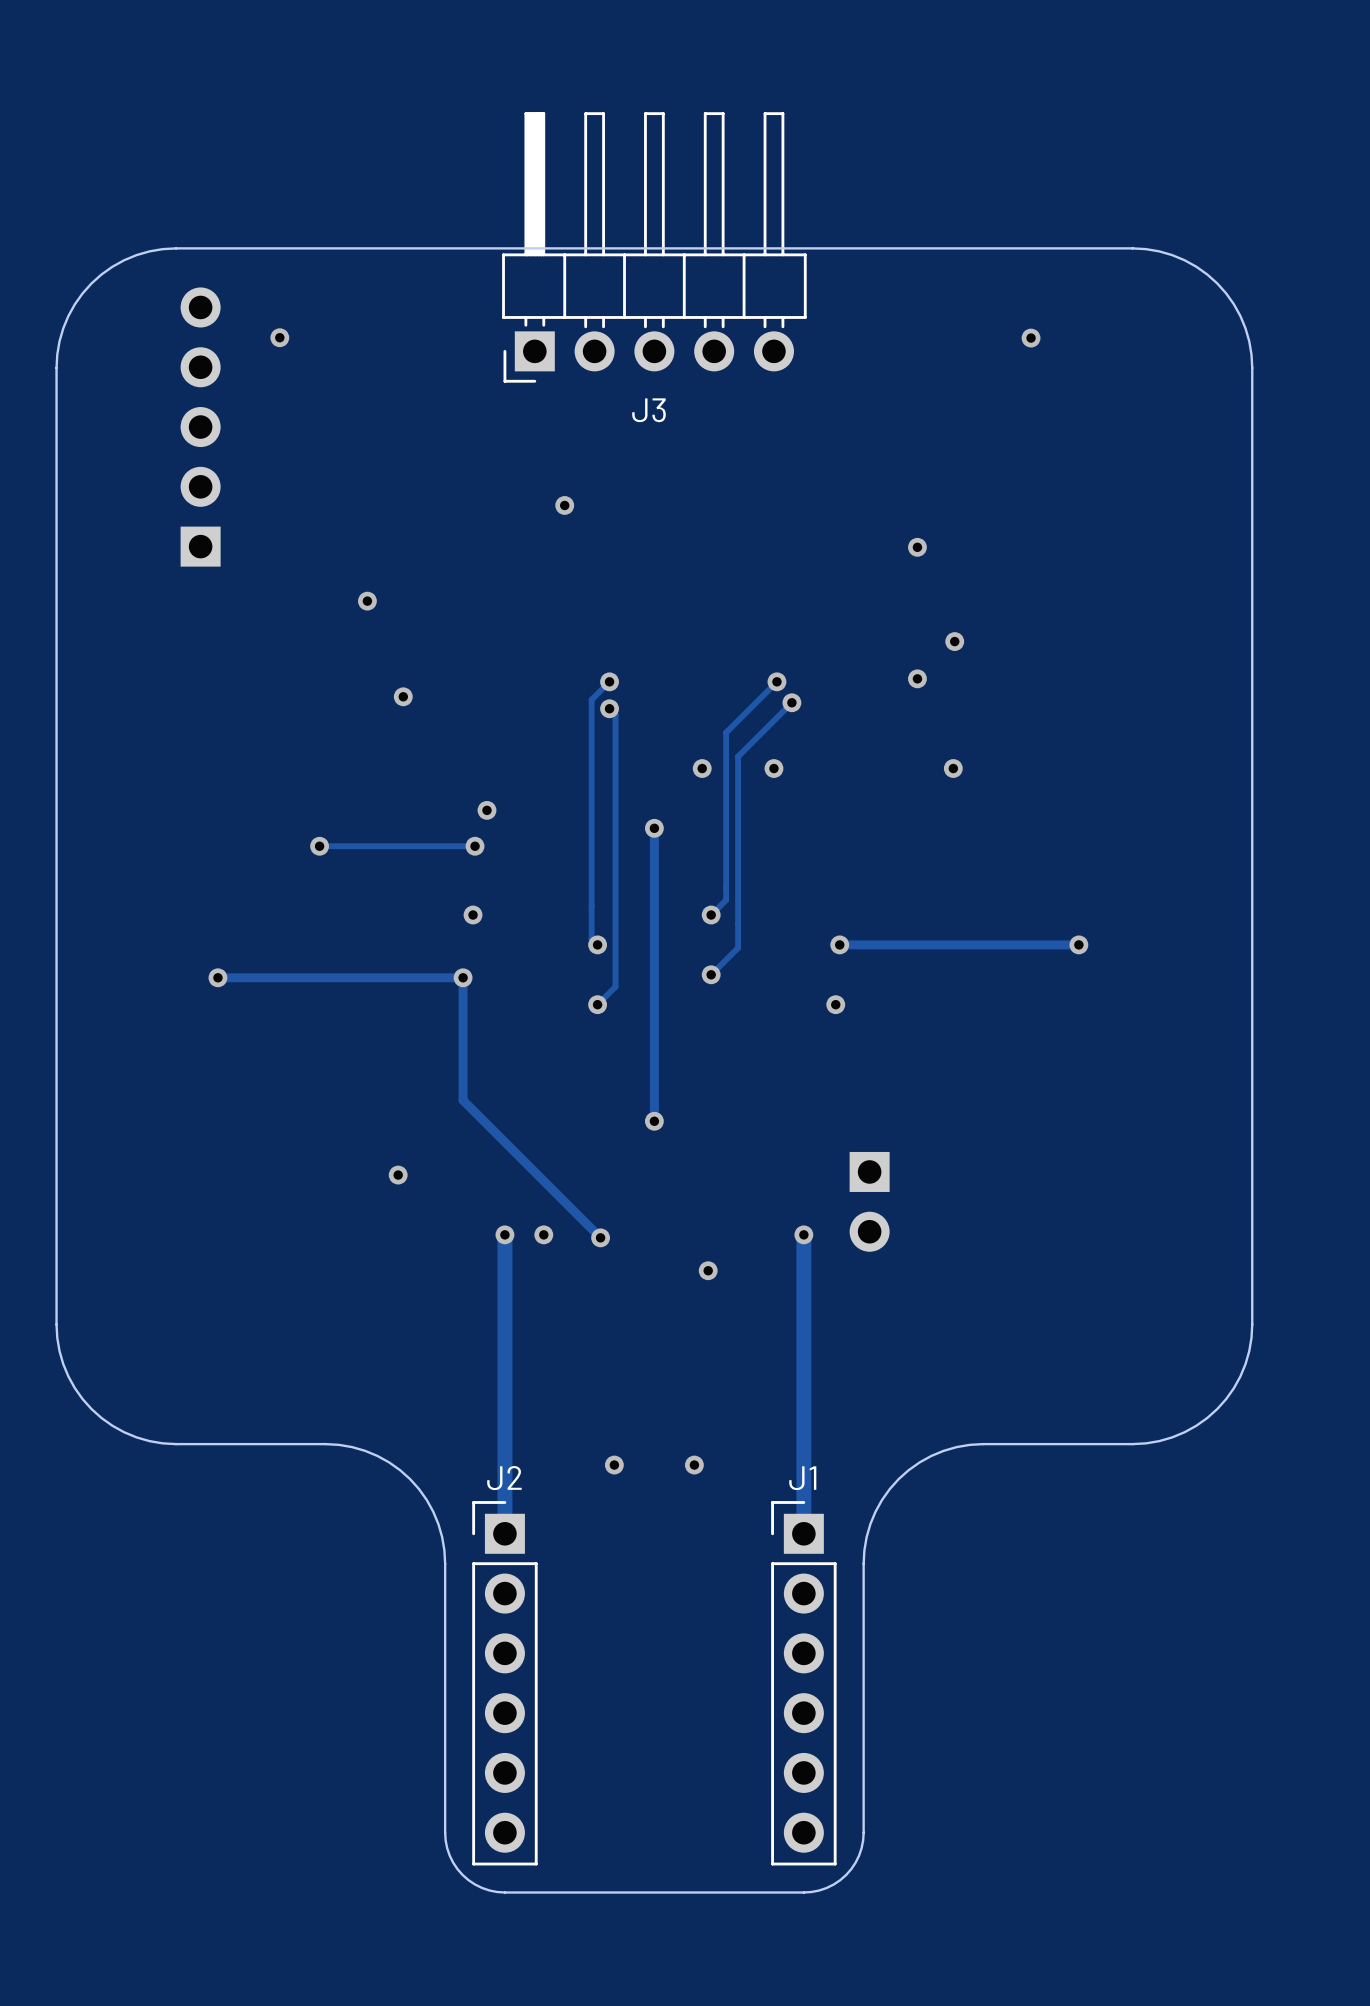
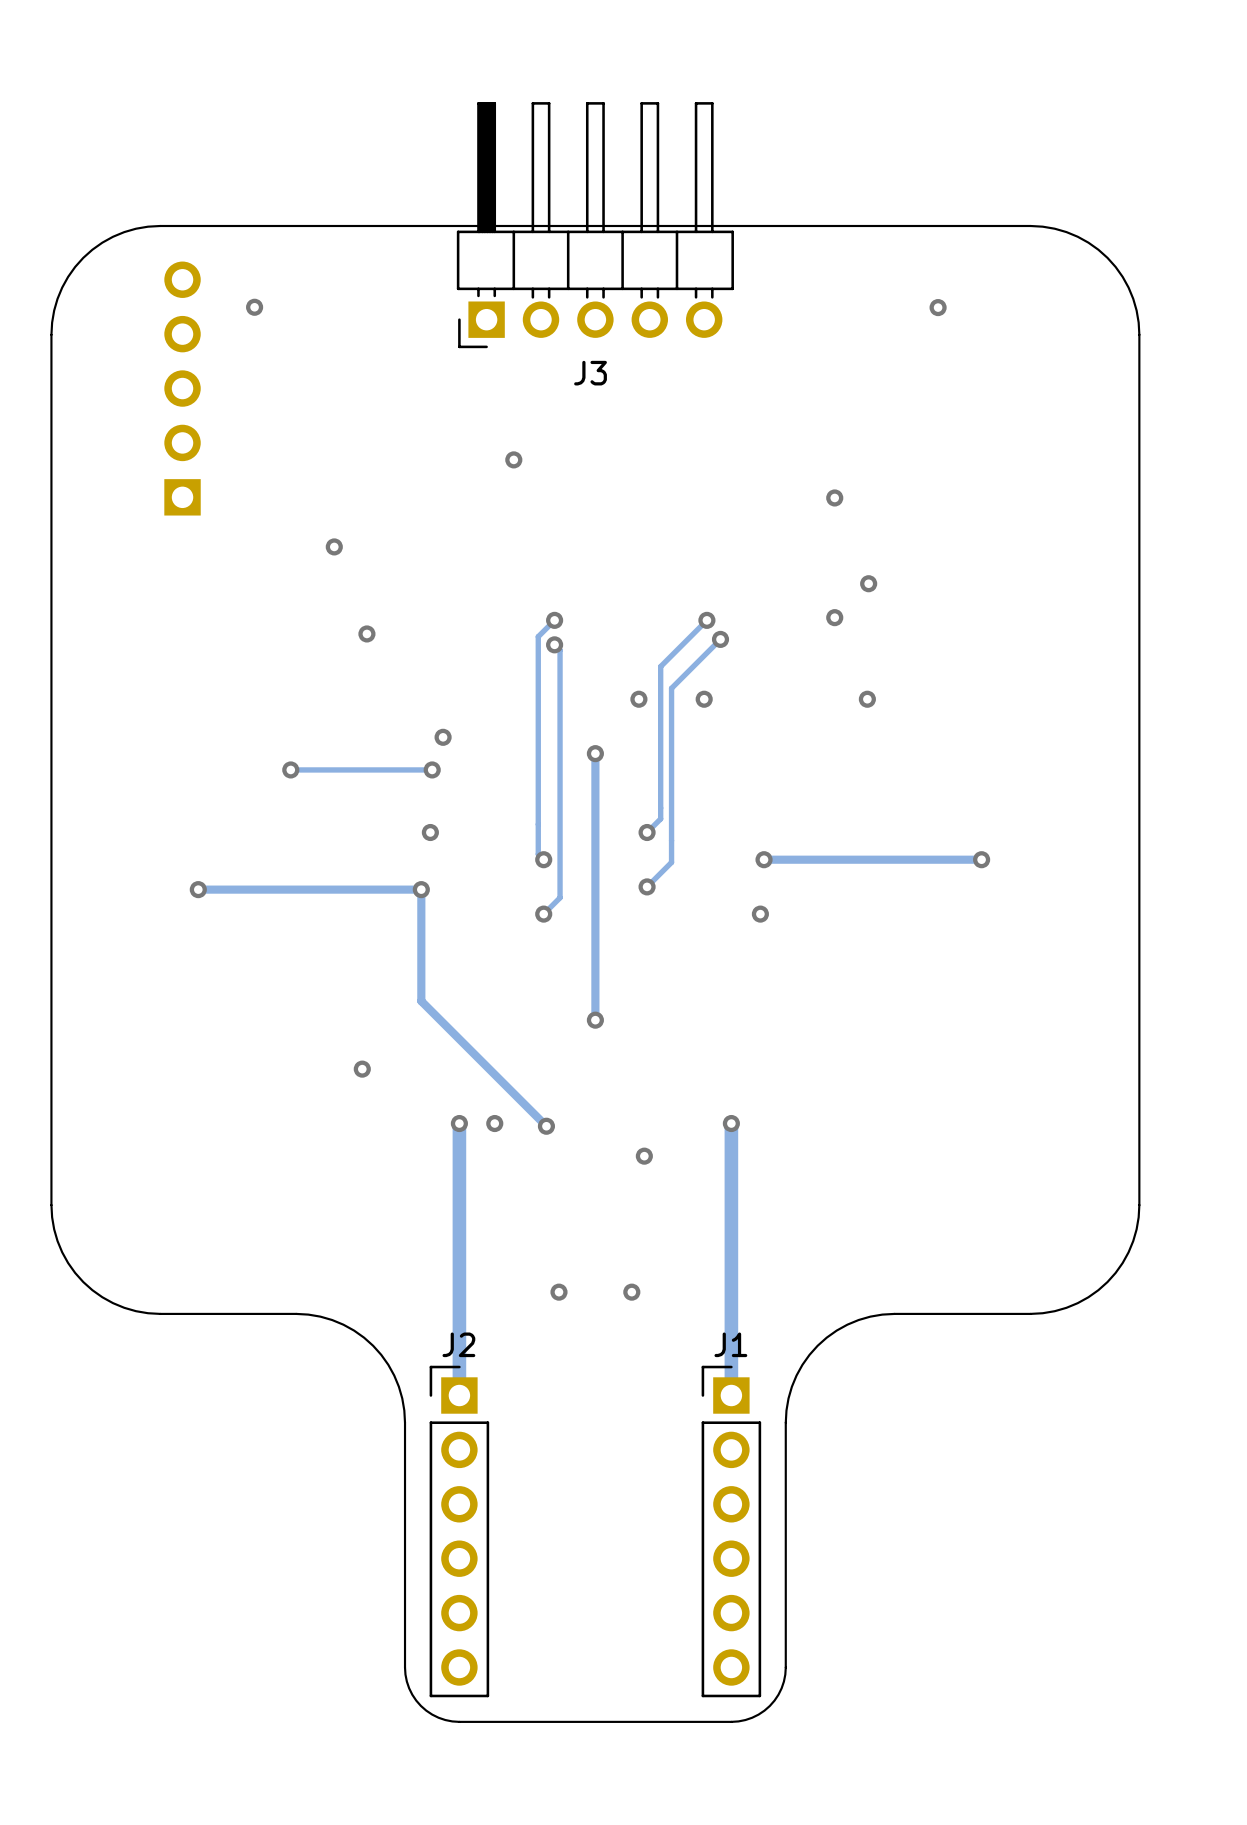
part: (869, 1201) -> none
via position: (614, 1465) -> (558, 1292)
via position: (694, 1465) -> (631, 1292)

